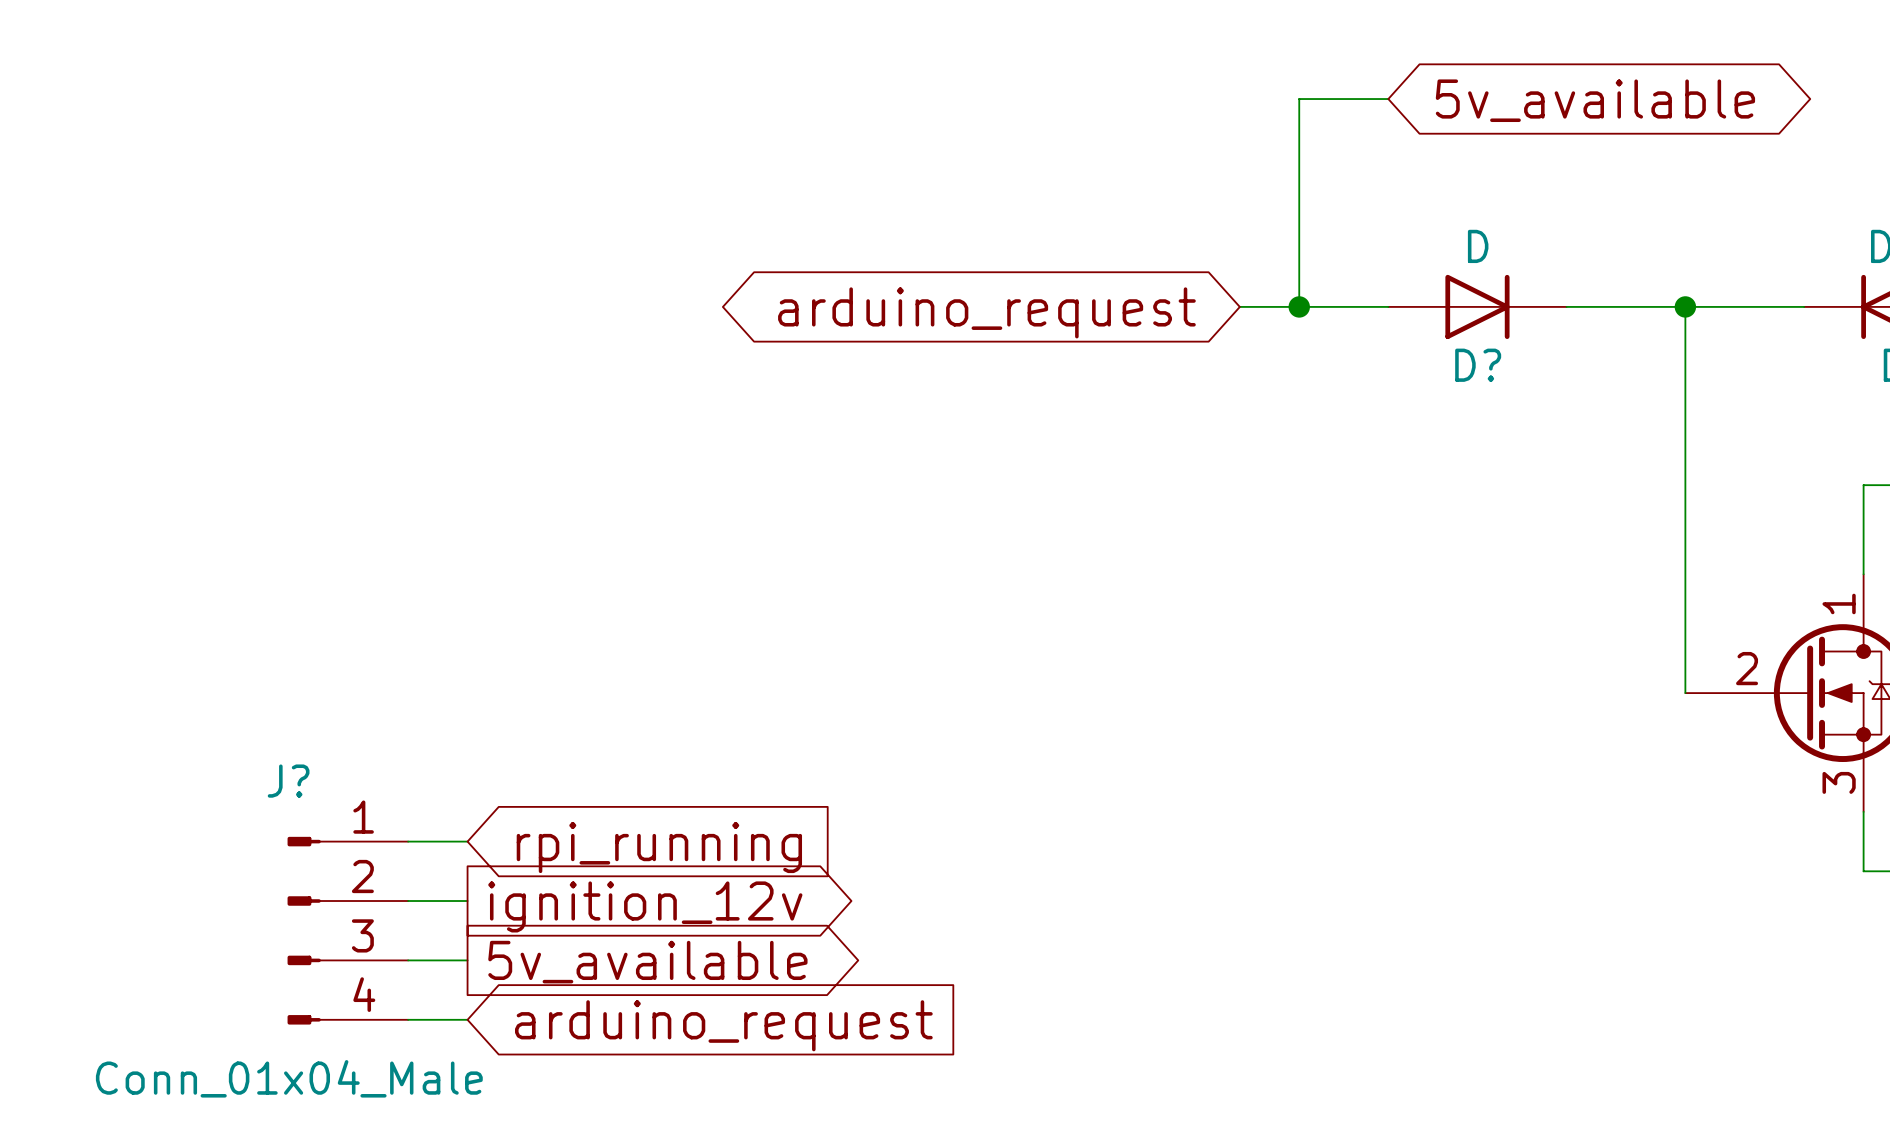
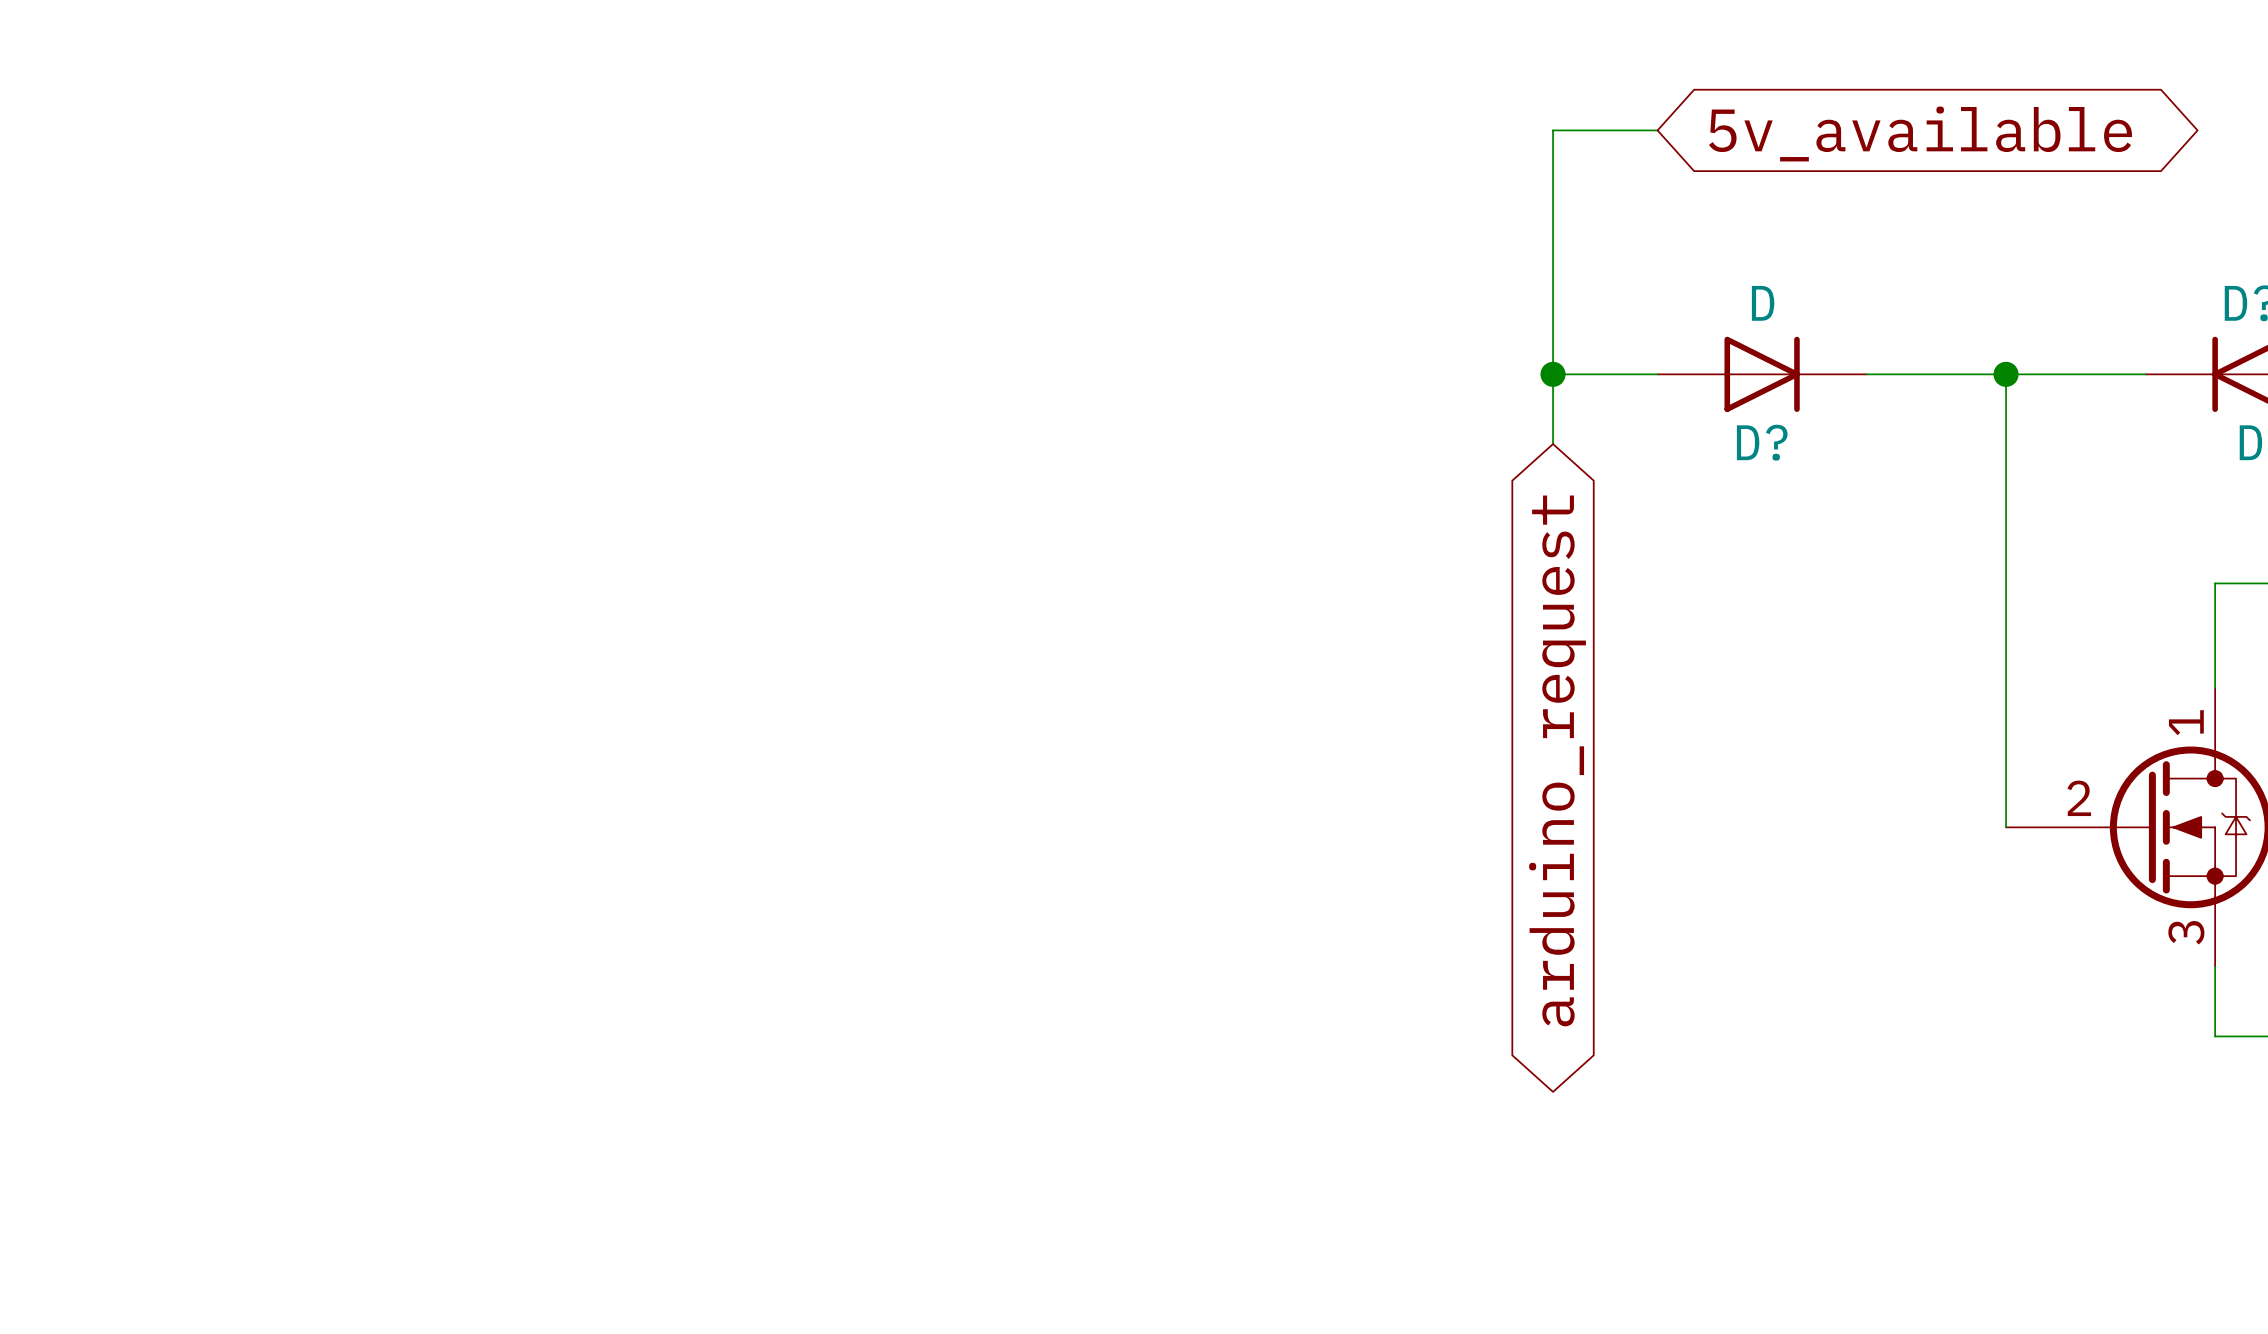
wire: (1239, 306) (1299, 306) -> (1553, 444) (1553, 374)
global label rotation: 0° (986, 312) -> 90° counterclockwise (1557, 760)
wire: (408, 841) (467, 841) -> none
global label: rpi_running (659, 847) -> none
wire: (408, 901) (467, 901) -> none
global label: ignition_12v (645, 906) -> none
J?: Conn_01x04_Male (347, 930) -> none
wire: (408, 960) (467, 960) -> none
global label: 5v_available (647, 962) -> none
wire: (408, 1019) (467, 1019) -> none
global label: arduino_request (723, 1025) -> none

